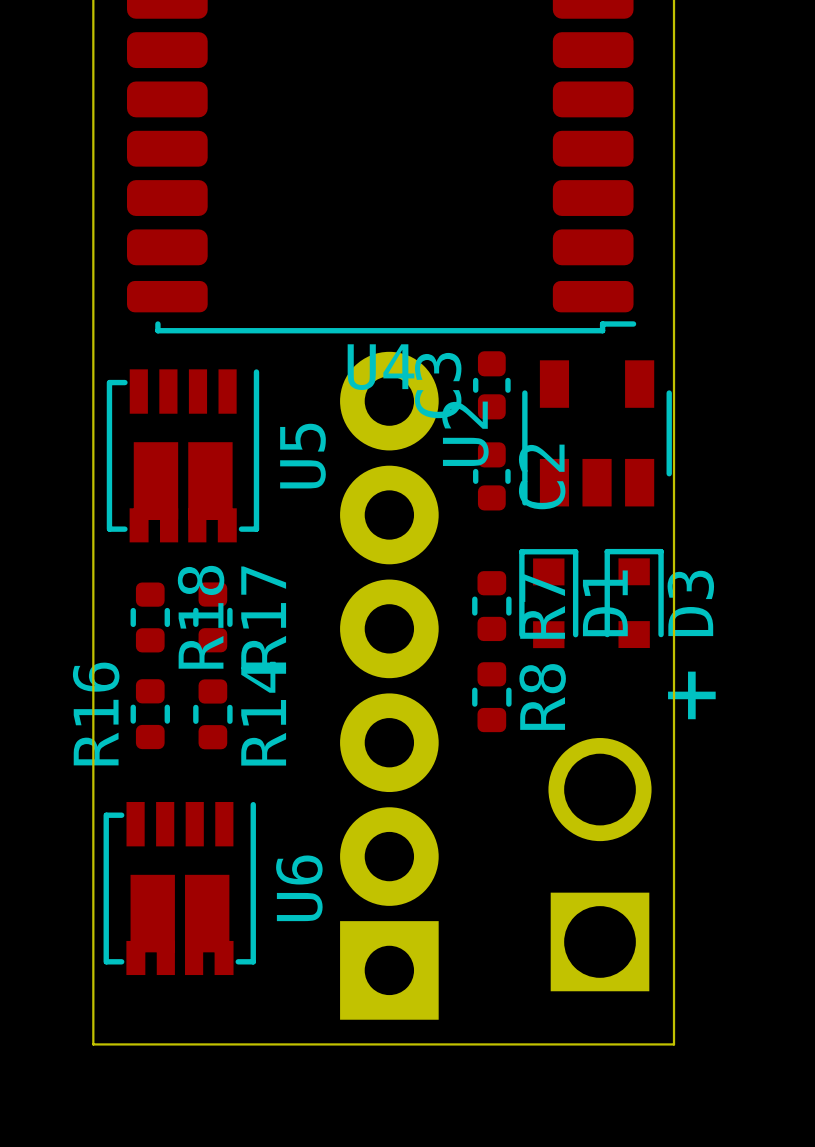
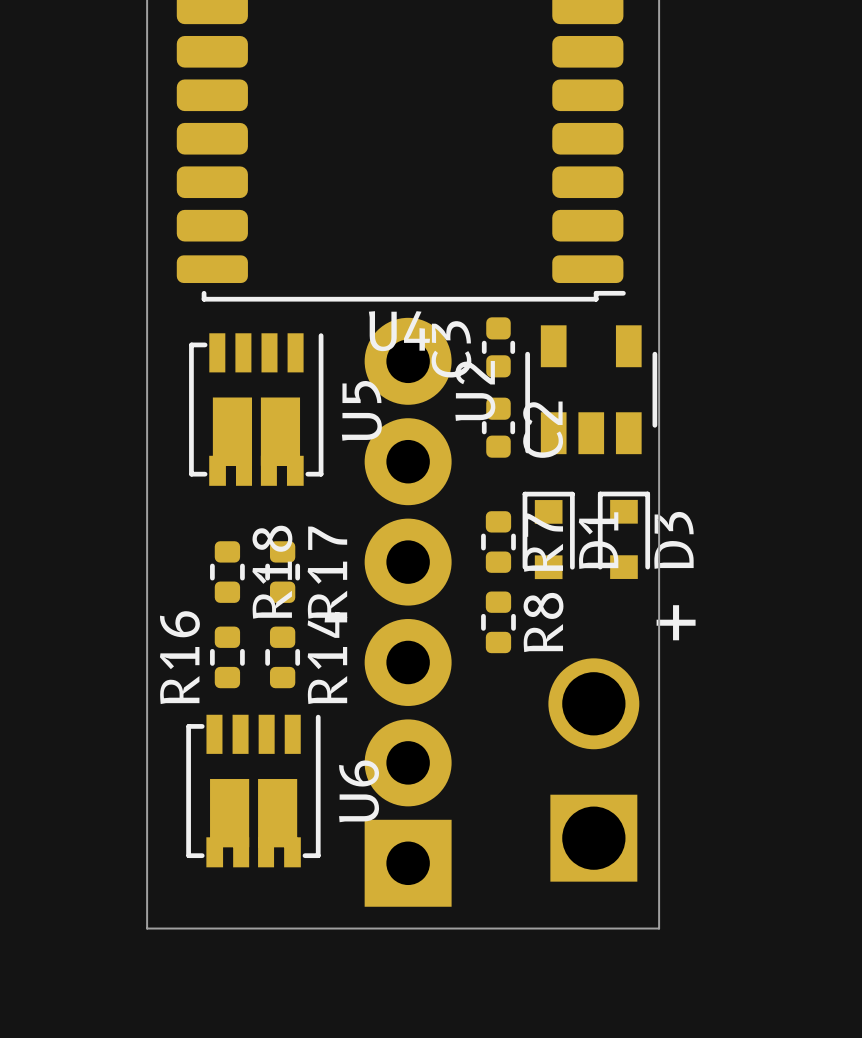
U5 position: (182, 455) -> (256, 409)
R18 position: (150, 617) -> (227, 572)
R17 position: (212, 617) -> (282, 572)
R16 position: (150, 714) -> (227, 657)
R14 position: (212, 714) -> (282, 657)
U6 position: (179, 888) -> (253, 791)

